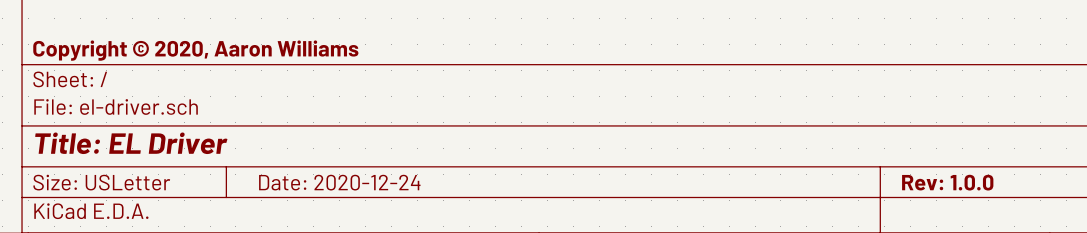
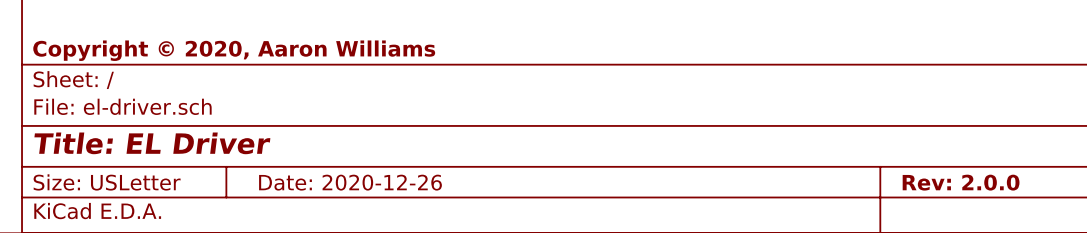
title block: Date: 2020-12-24 (339, 182) -> Date: 2020-12-26 (350, 182)
title block: Rev: 1.0.0 (947, 182) -> Rev: 2.0.0 (961, 182)

